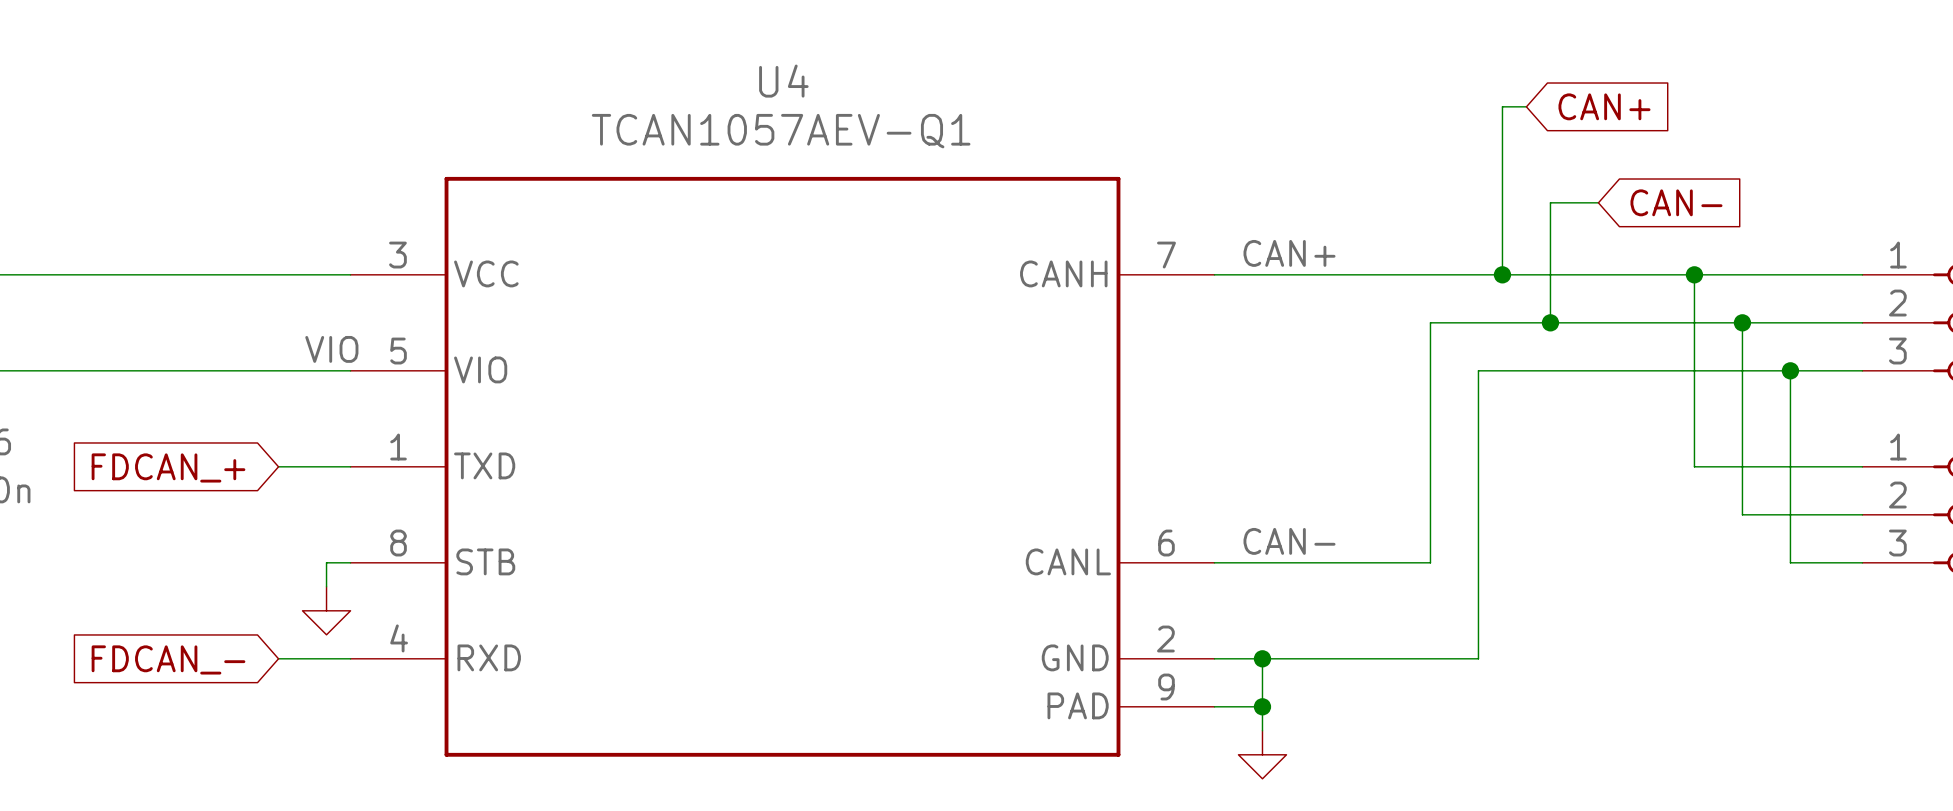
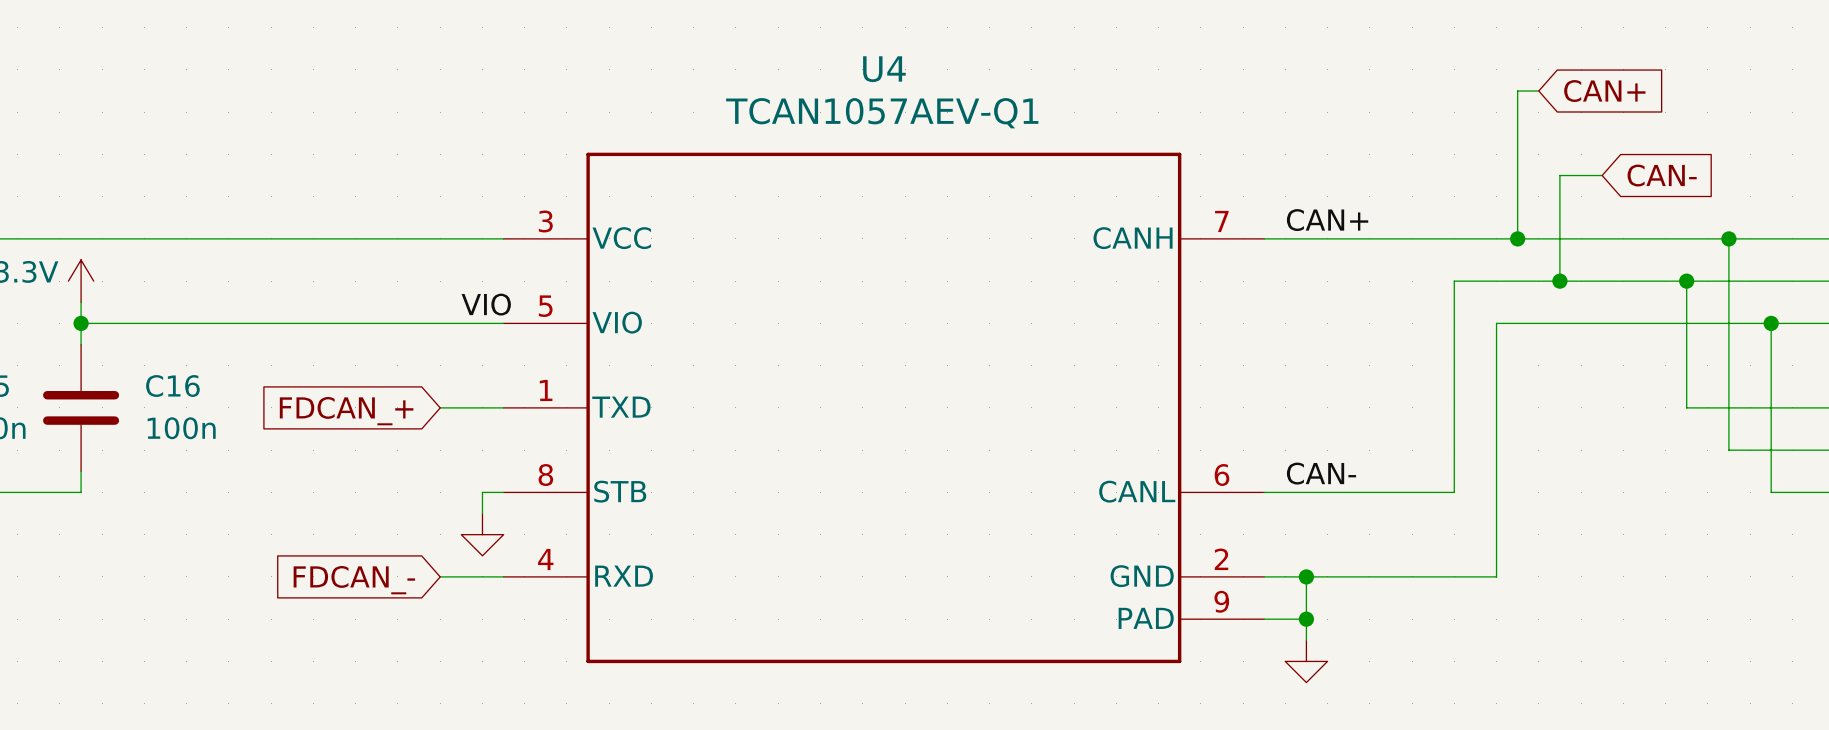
wire: (1694, 274) (1694, 322) -> (1728, 238) (1728, 281)
junction: (1694, 274) -> none
junction: none -> (1728, 238)
junction: none -> (1686, 281)
junction: (1742, 322) -> none

